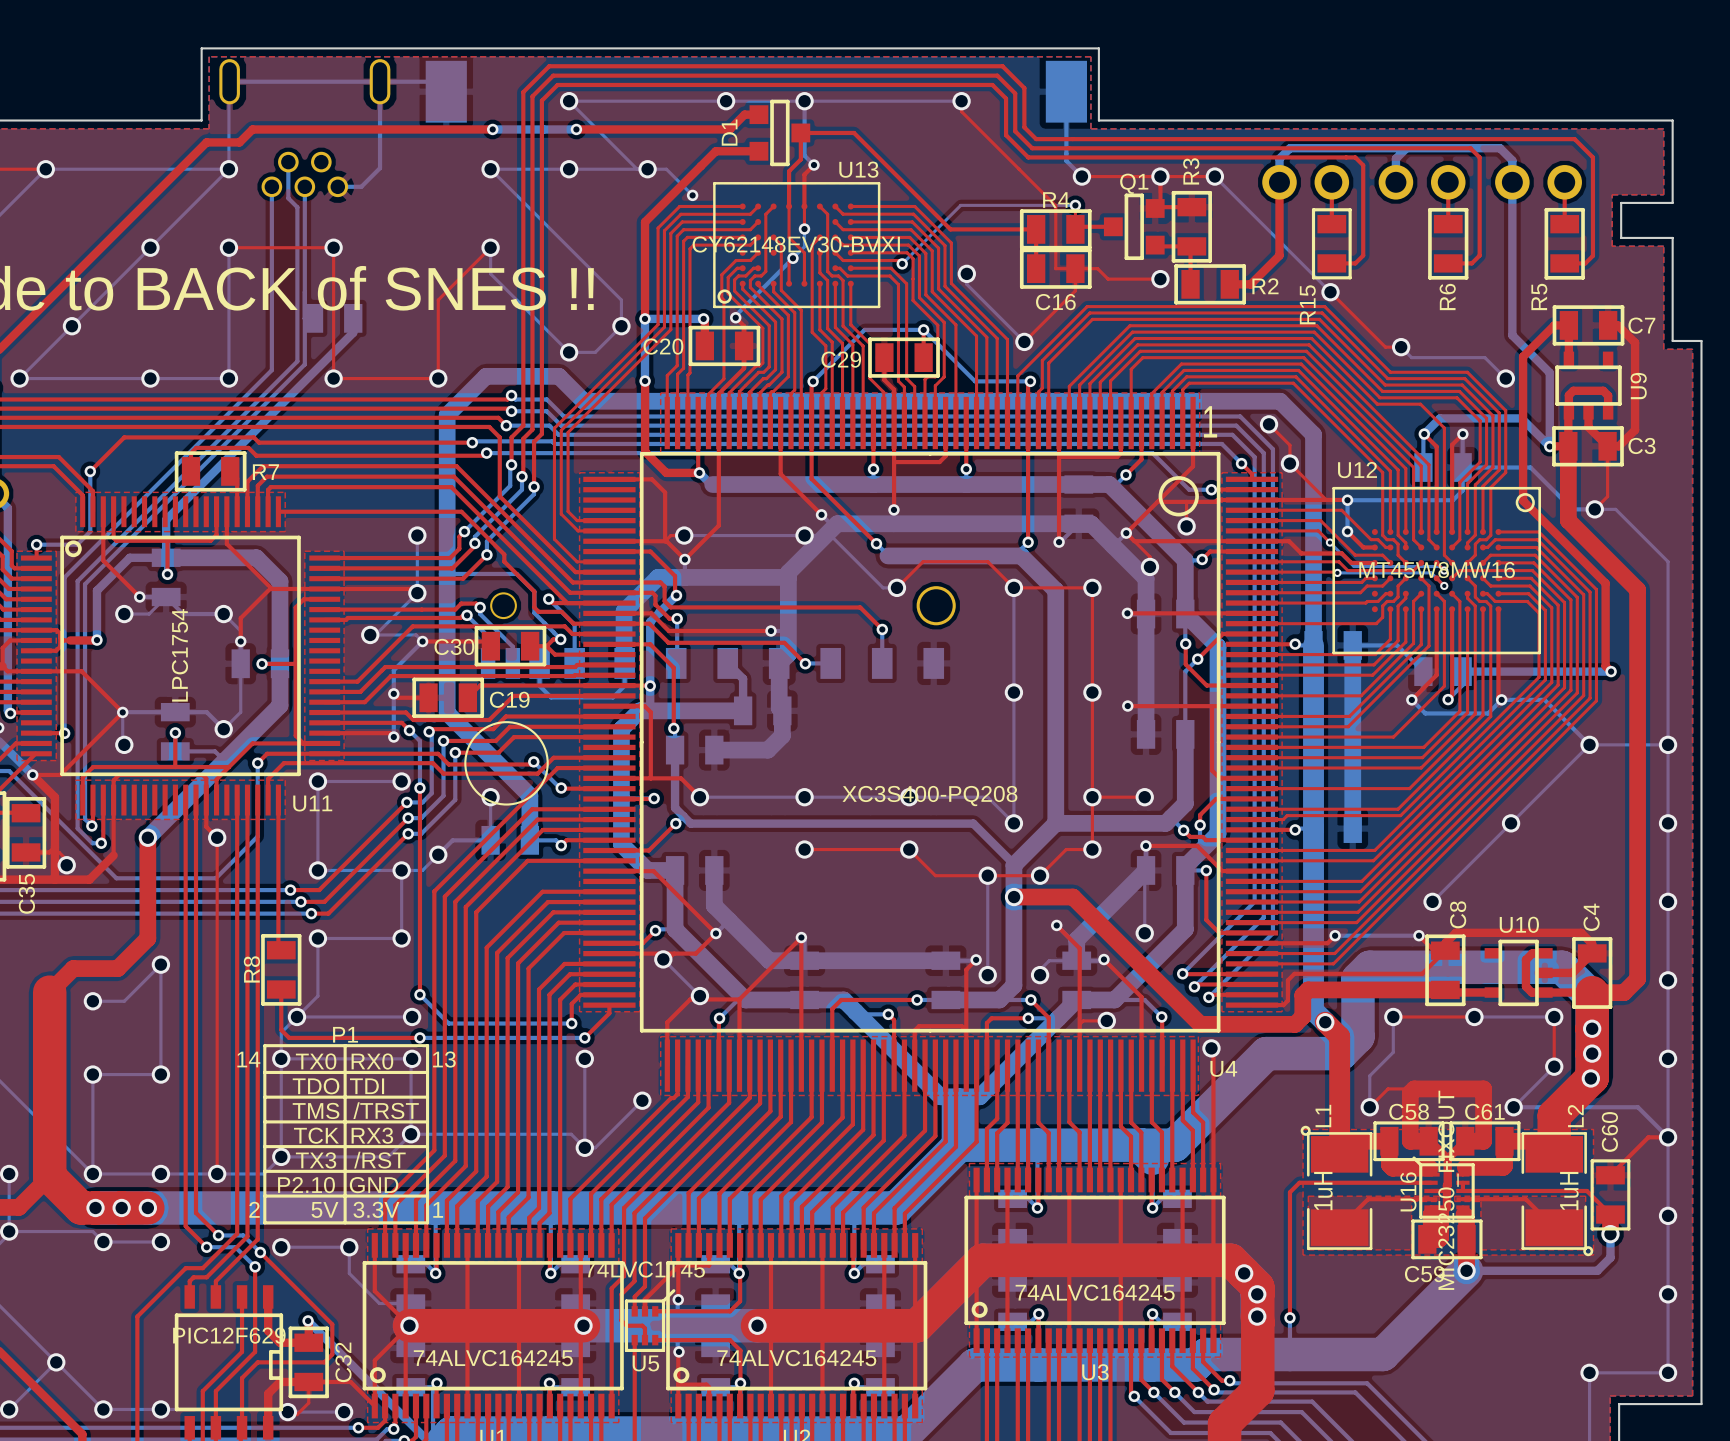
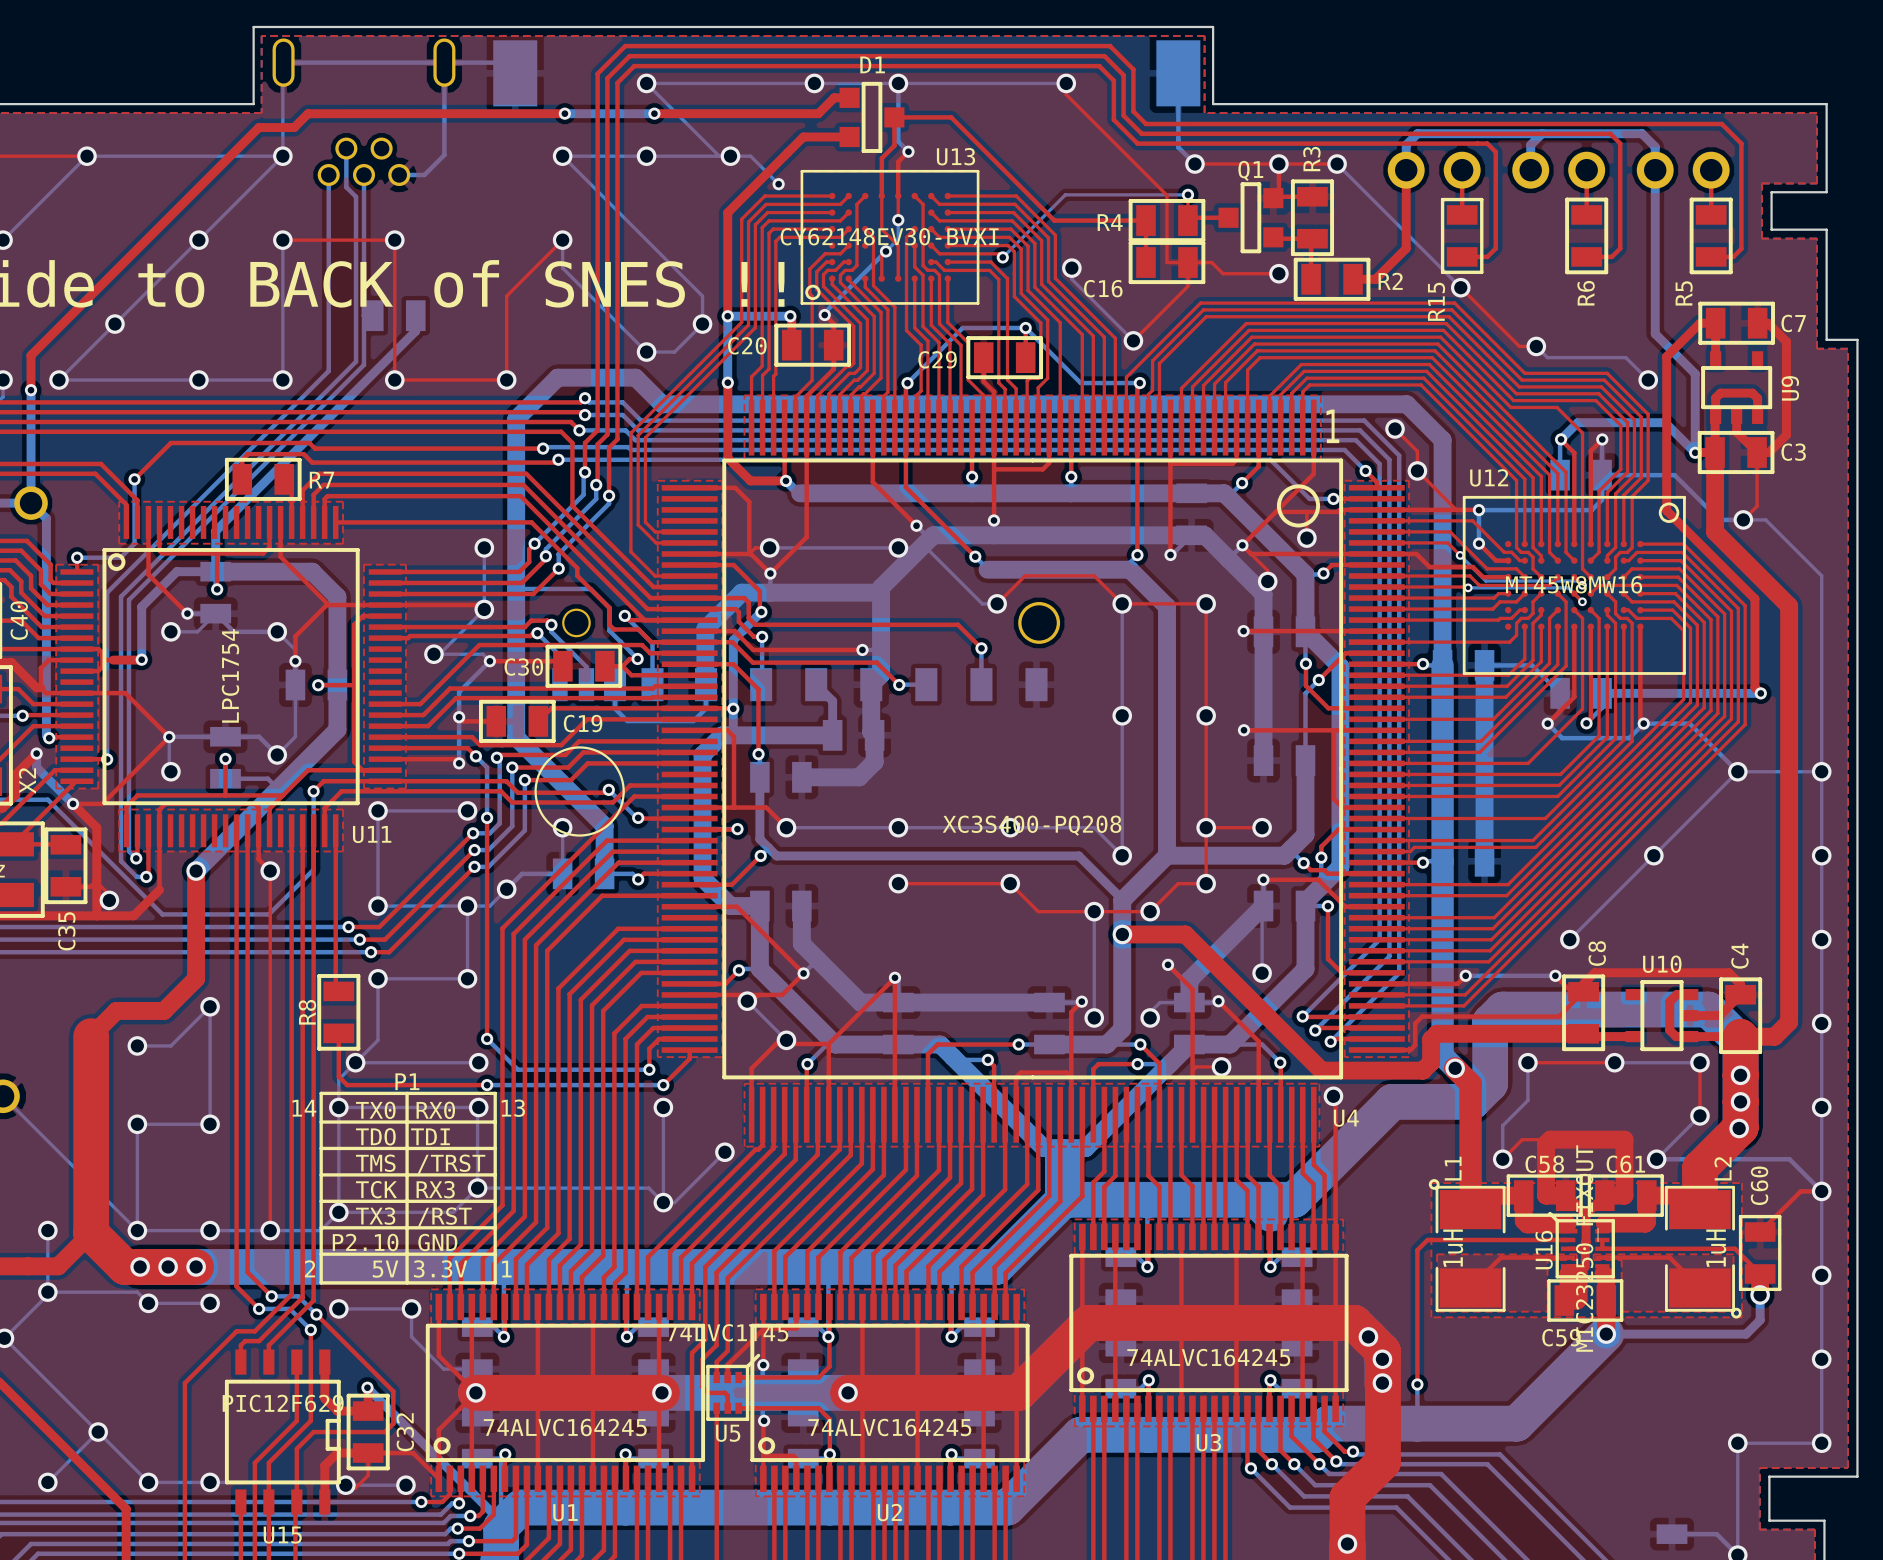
D1 name rotation: 0° (729, 132) -> 90° clockwise (872, 64)
D1 name position: D1 (729, 132) -> D1 (872, 64)
R4 name position: R4 (1056, 200) -> R4 (1110, 222)
C16 name position: C16 (1055, 302) -> C16 (1103, 288)

